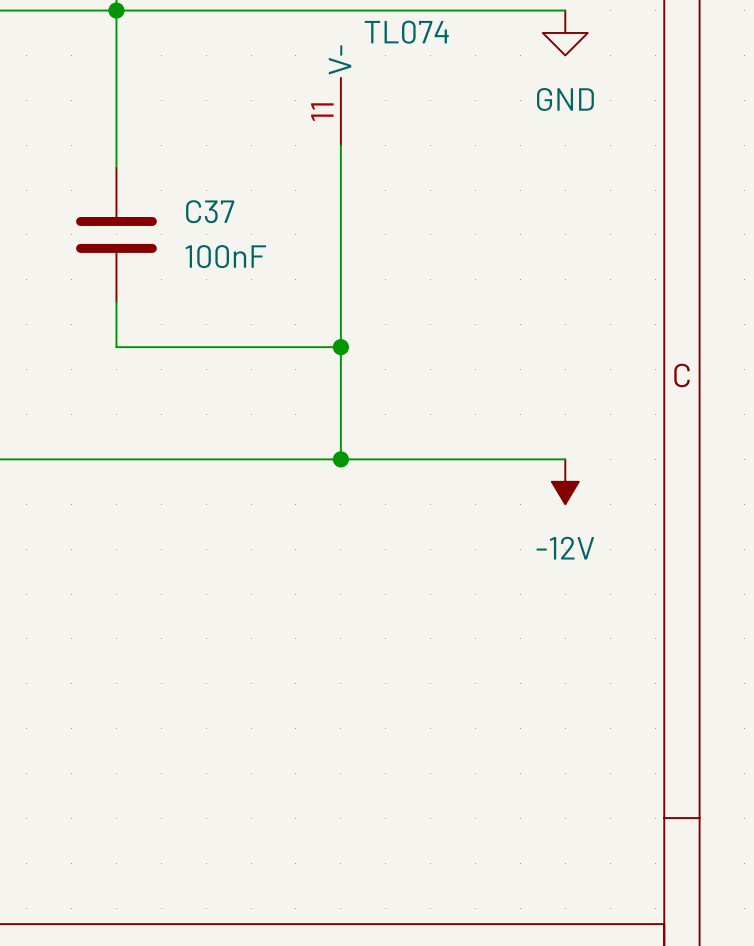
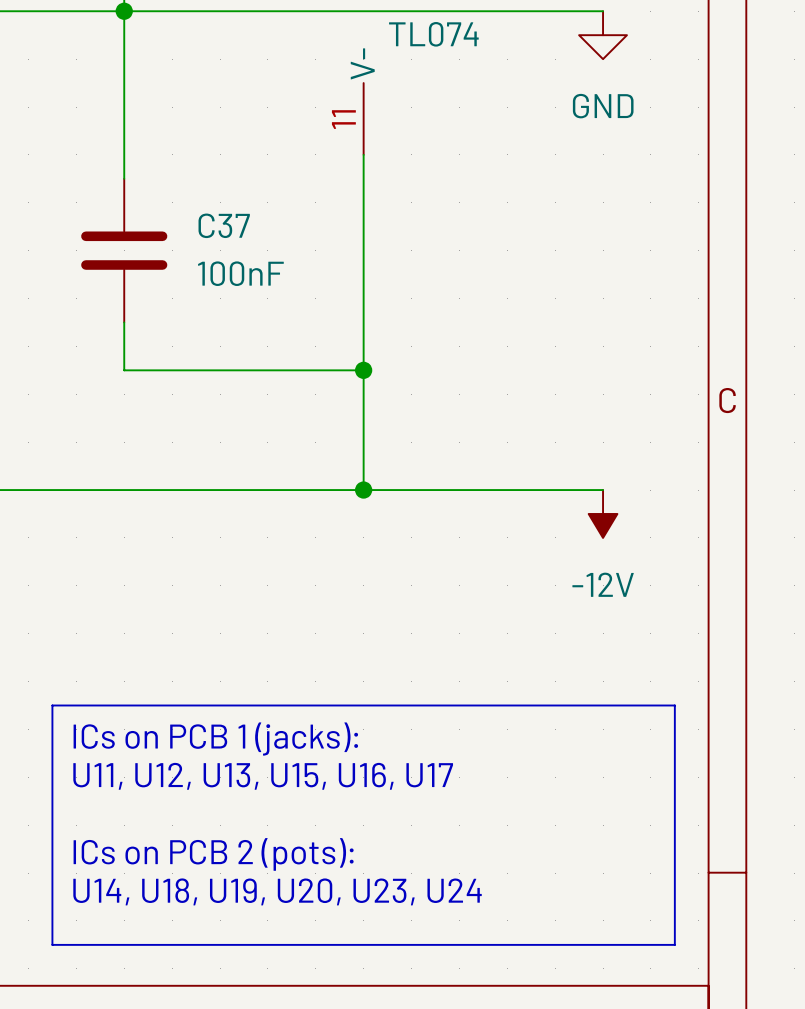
line: none -> (52, 705) (674, 705) (674, 944) (52, 944) (52, 705)
text: none -> ICs on PCB 1 (jacks): (215, 739)
text: none -> U11, U12, U13, U15, U16, U17 (263, 776)
text: none -> ICs on PCB 2 (pots): (213, 854)
text: none -> U14, U18, U19, U20, U23, U24 (277, 891)

